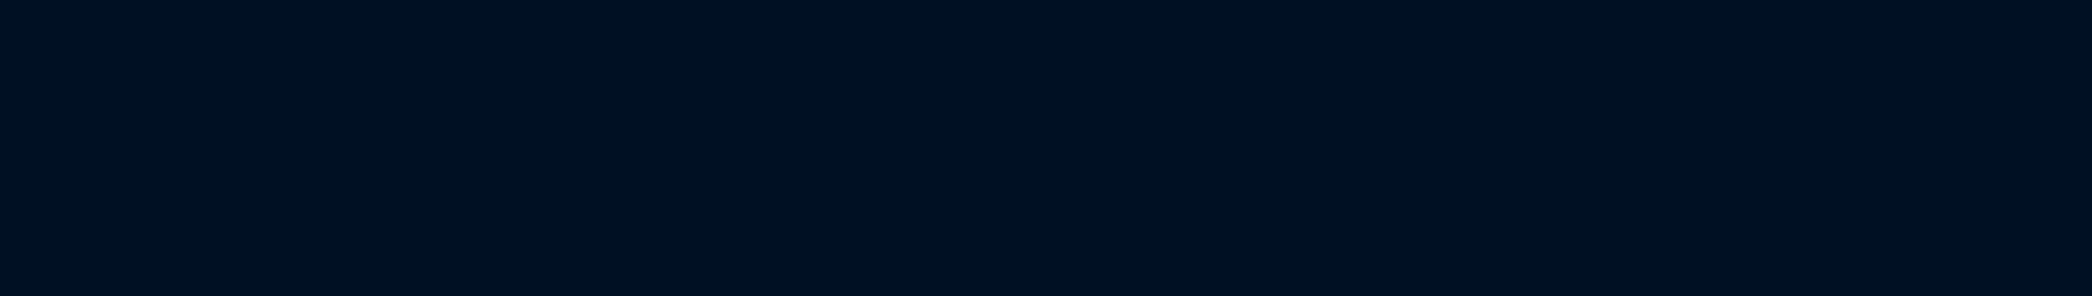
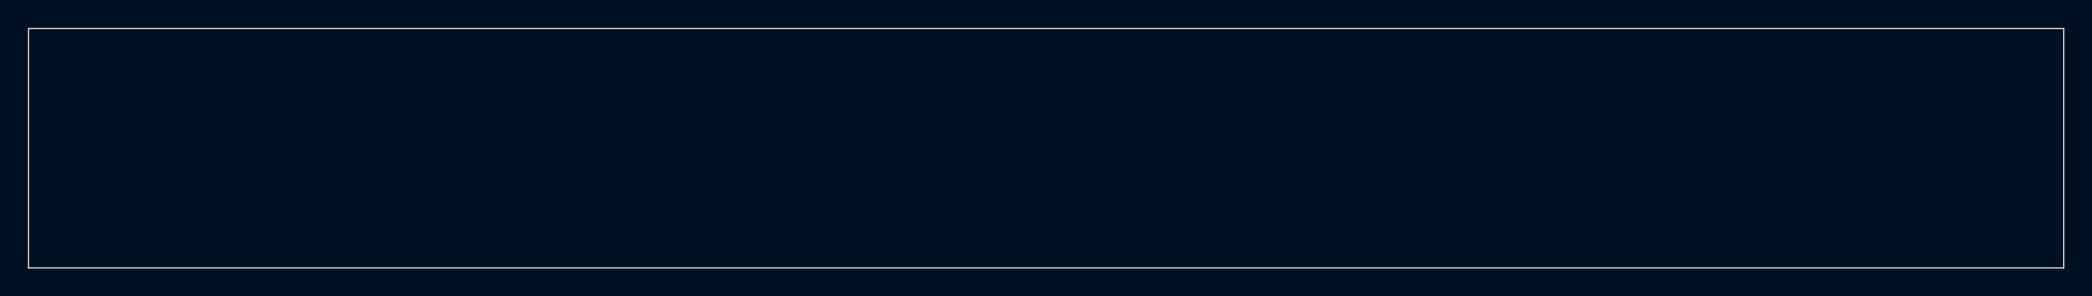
board edge: none -> (2063, 28) (28, 28) (28, 267) (2063, 267) (2063, 28)

